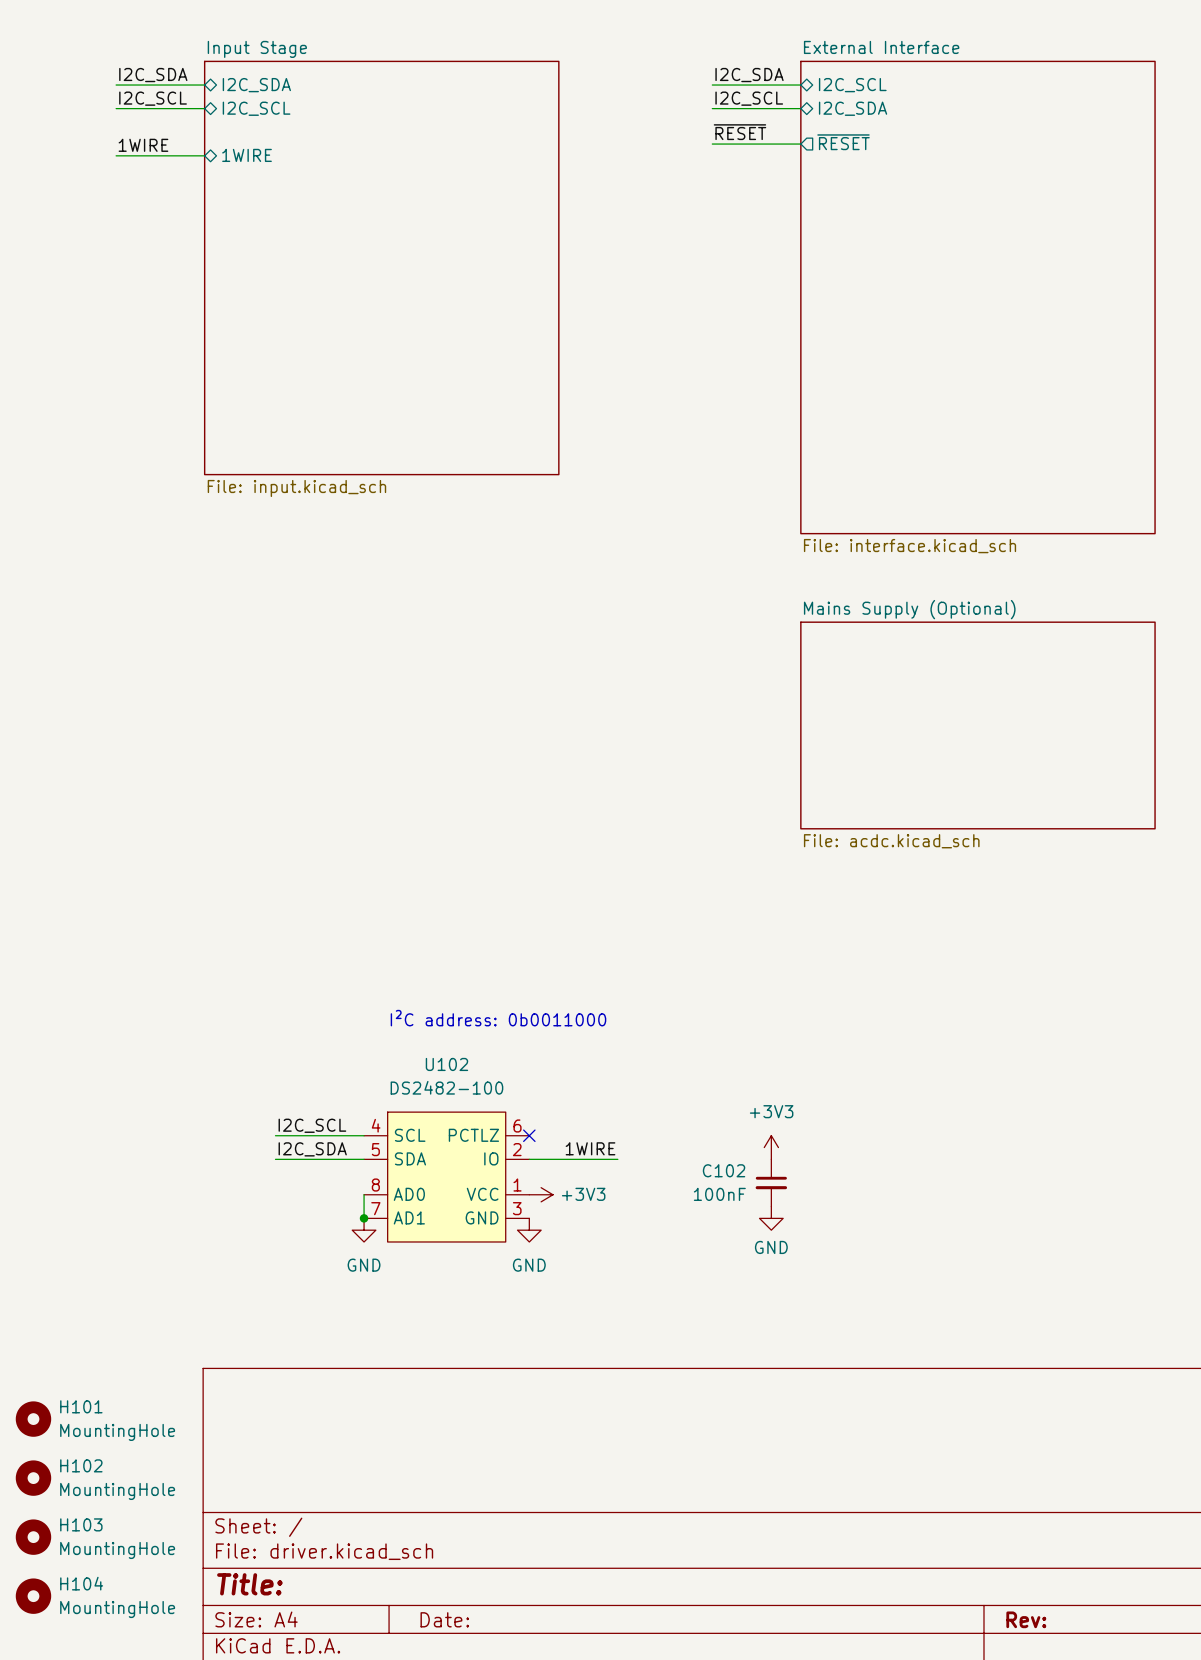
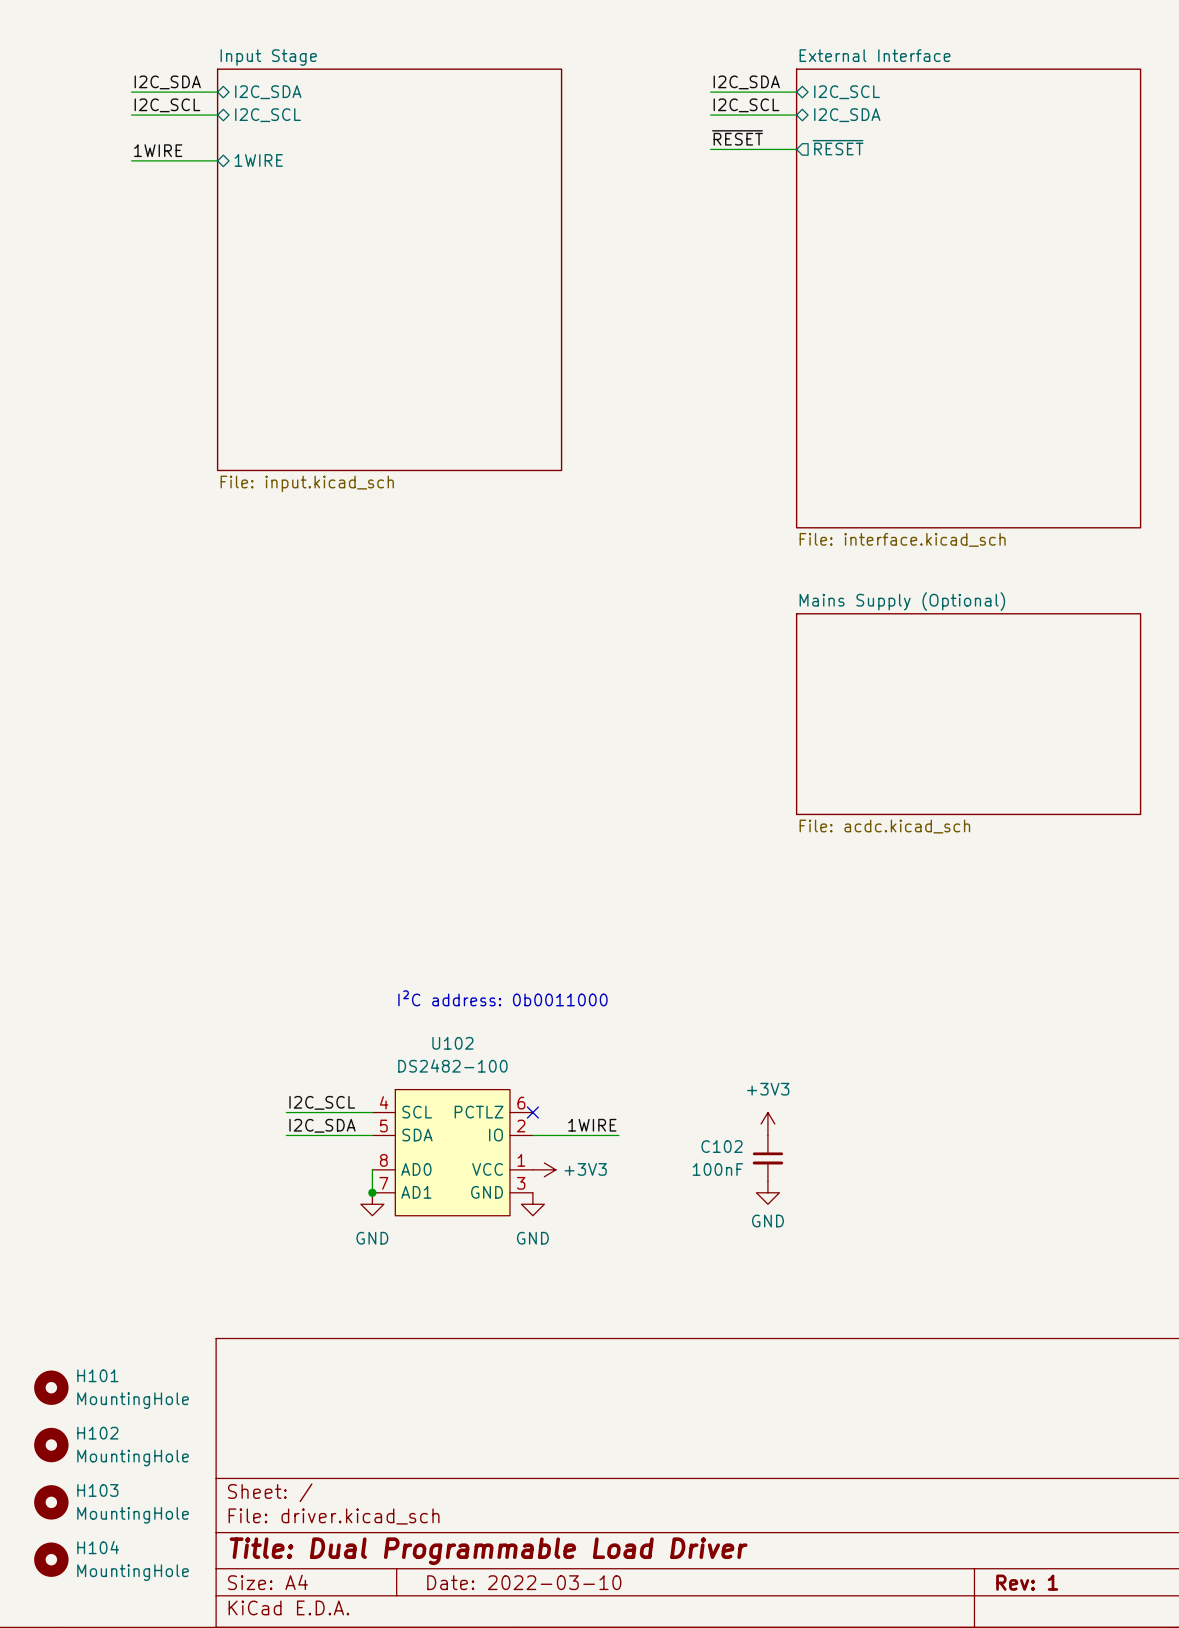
title block: Title: (249, 1584) -> Title: Dual Programmable Load Driver (488, 1551)
title block: Date: (444, 1619) -> Date: 2022-03-10 (524, 1582)
title block: Rev: (1026, 1619) -> Rev: 1 (1027, 1582)

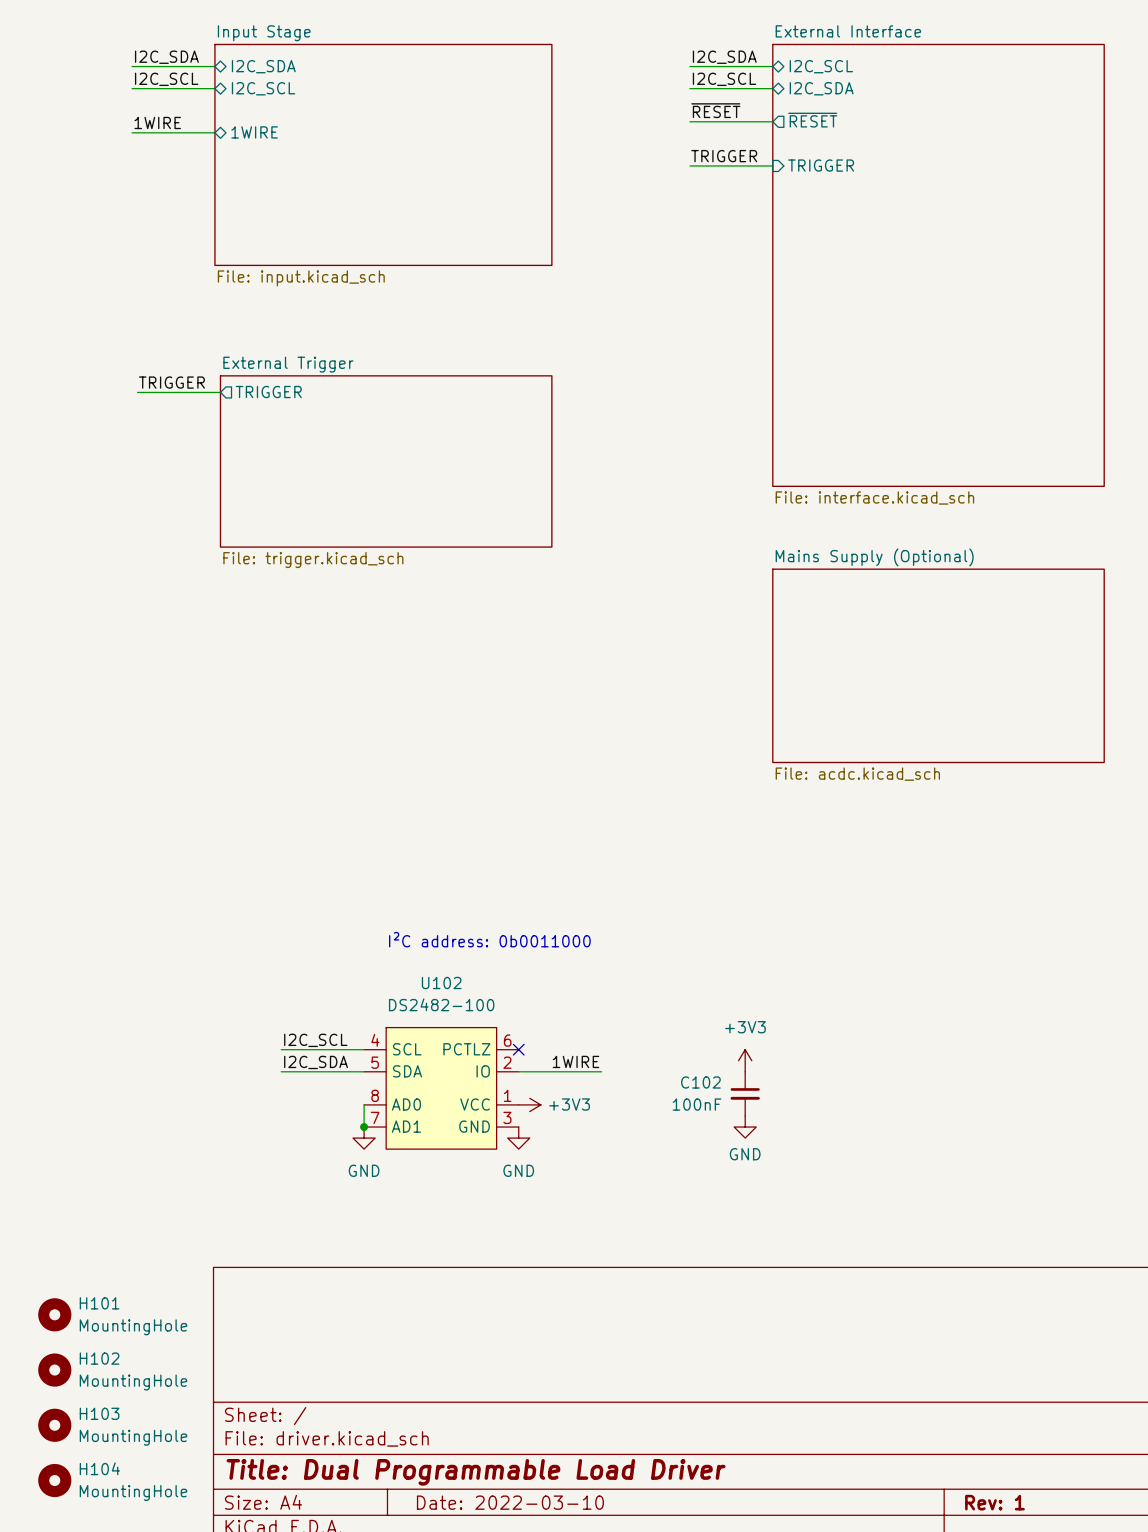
sheet Input Stage: none -> File: input.kicad_sch (383, 154)
label: none -> TRIGGER (724, 156)
sheet pin: none -> TRIGGER (821, 165)
wire: none -> (689, 165) (772, 165)
sheet Input Stage: File: input.kicad_sch (389, 269) -> none
label: none -> TRIGGER (171, 382)
sheet pin: none -> TRIGGER (268, 392)
wire: none -> (137, 392) (220, 392)
sheet External Trigger: none -> File: trigger.kicad_sch (386, 461)

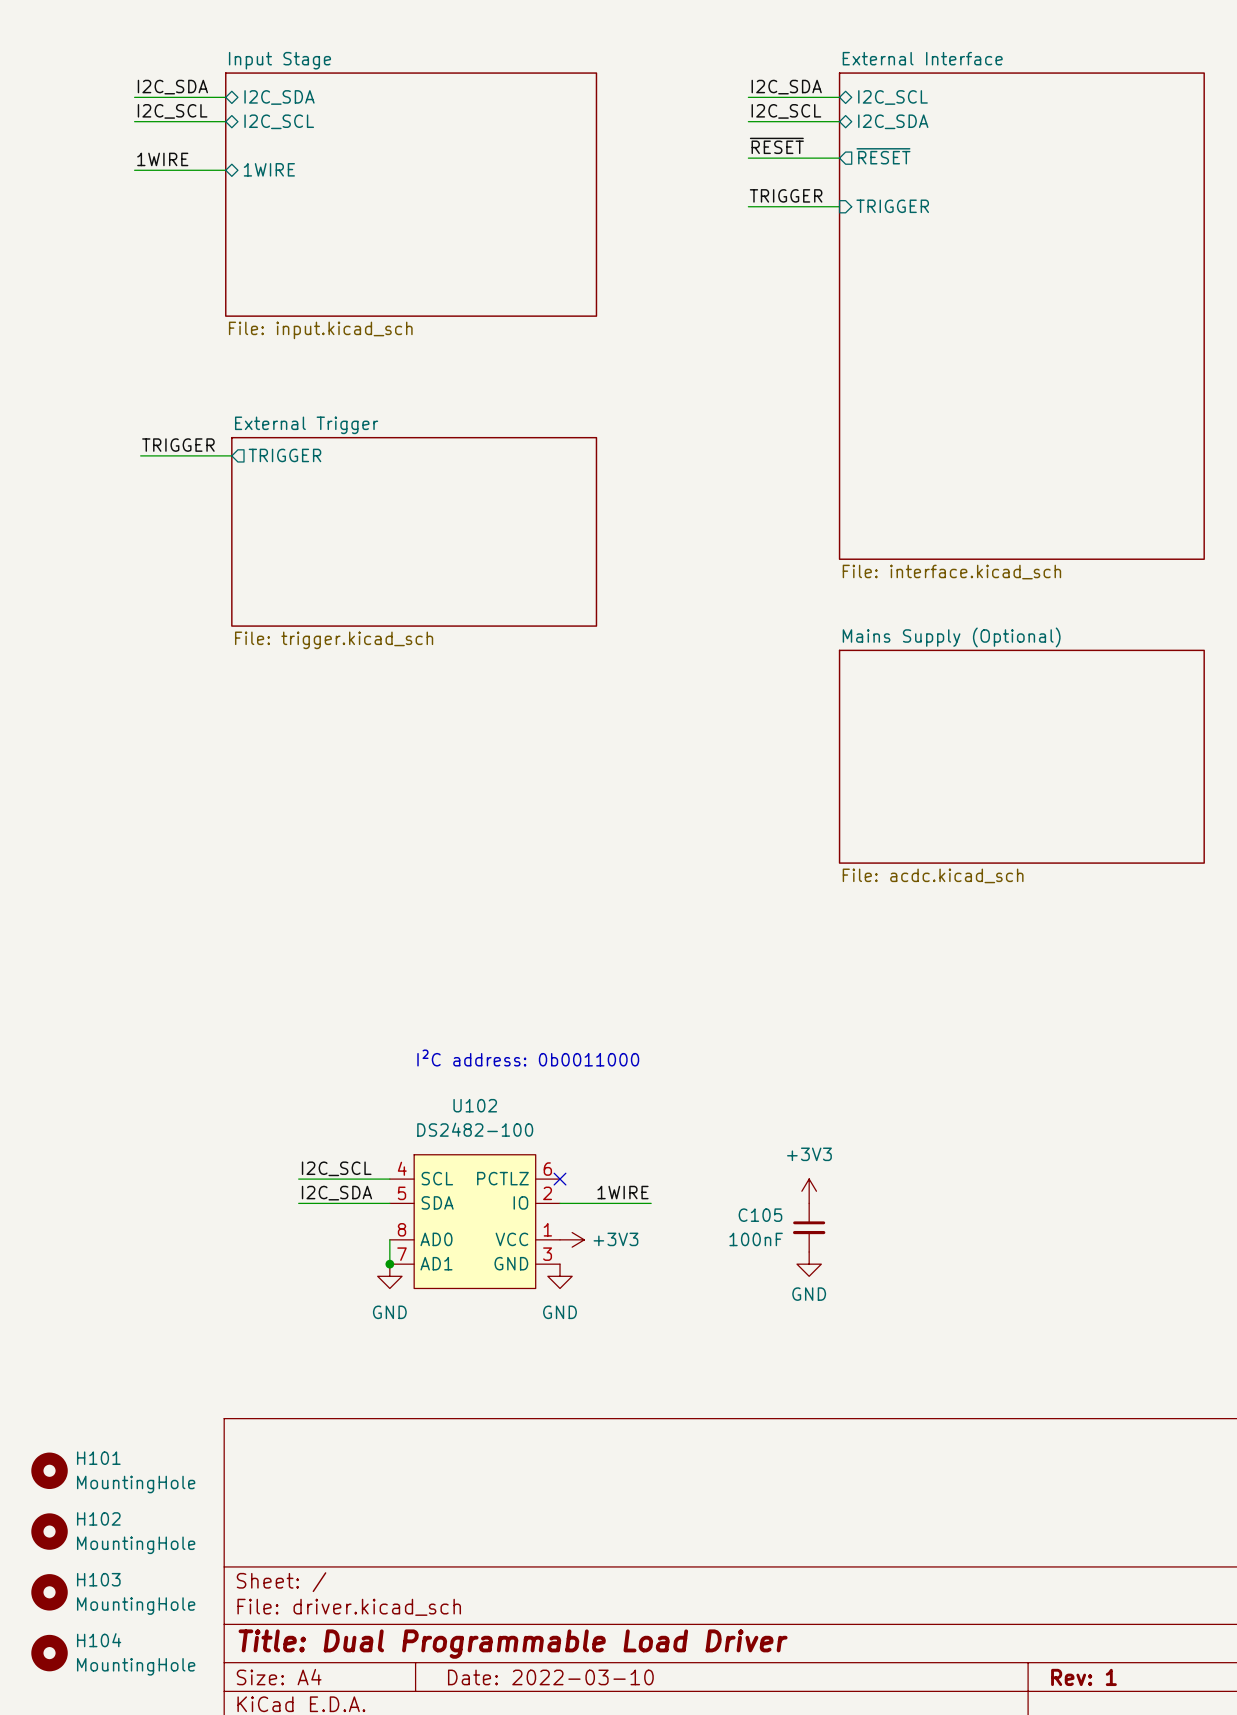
C102 name: C102 (700, 1082) -> C105 (760, 1215)

